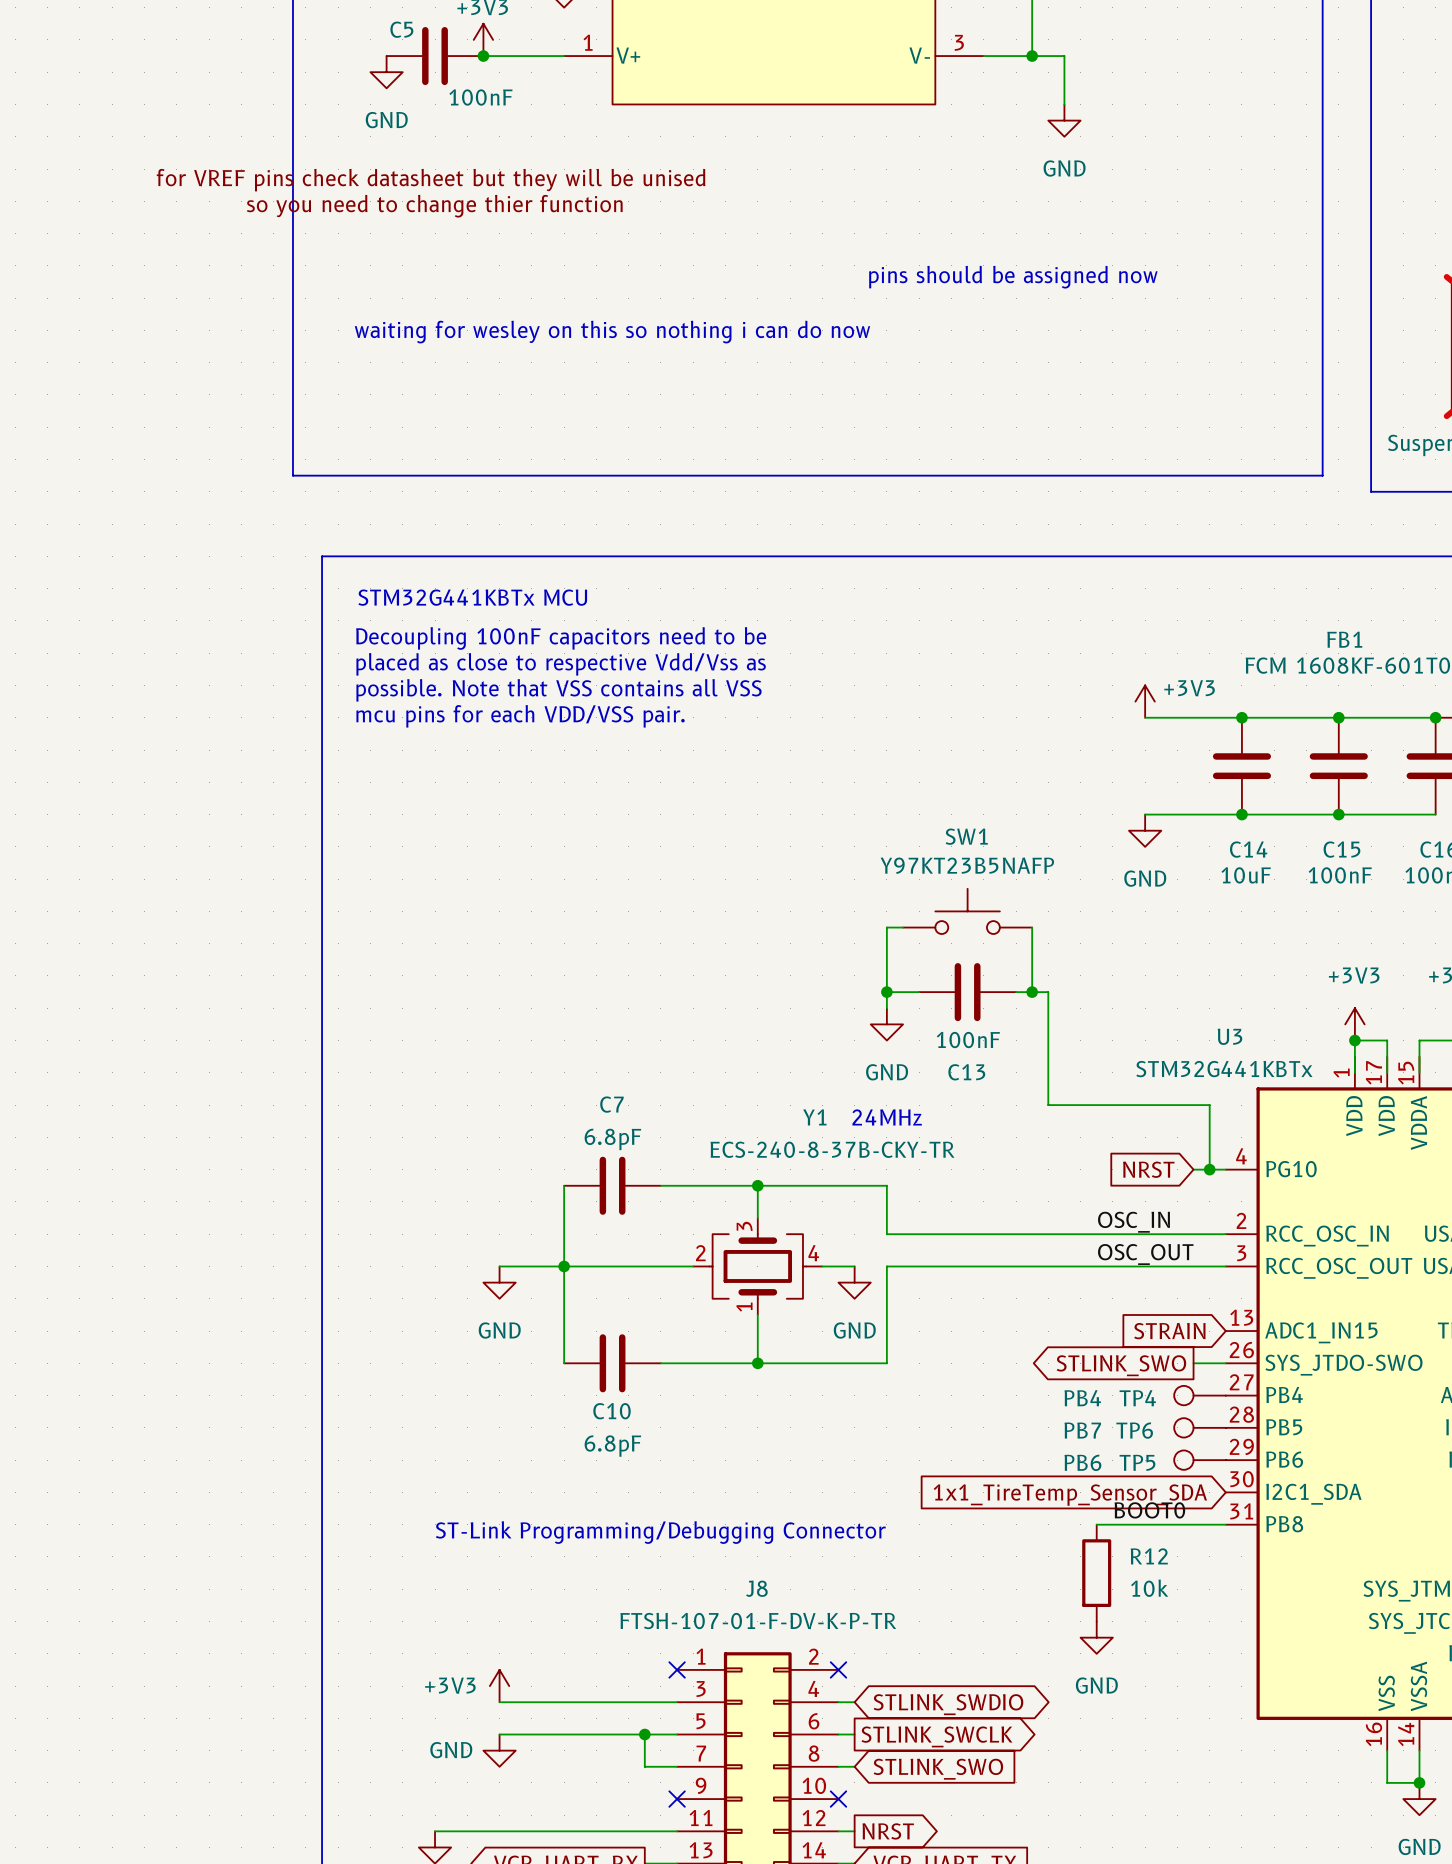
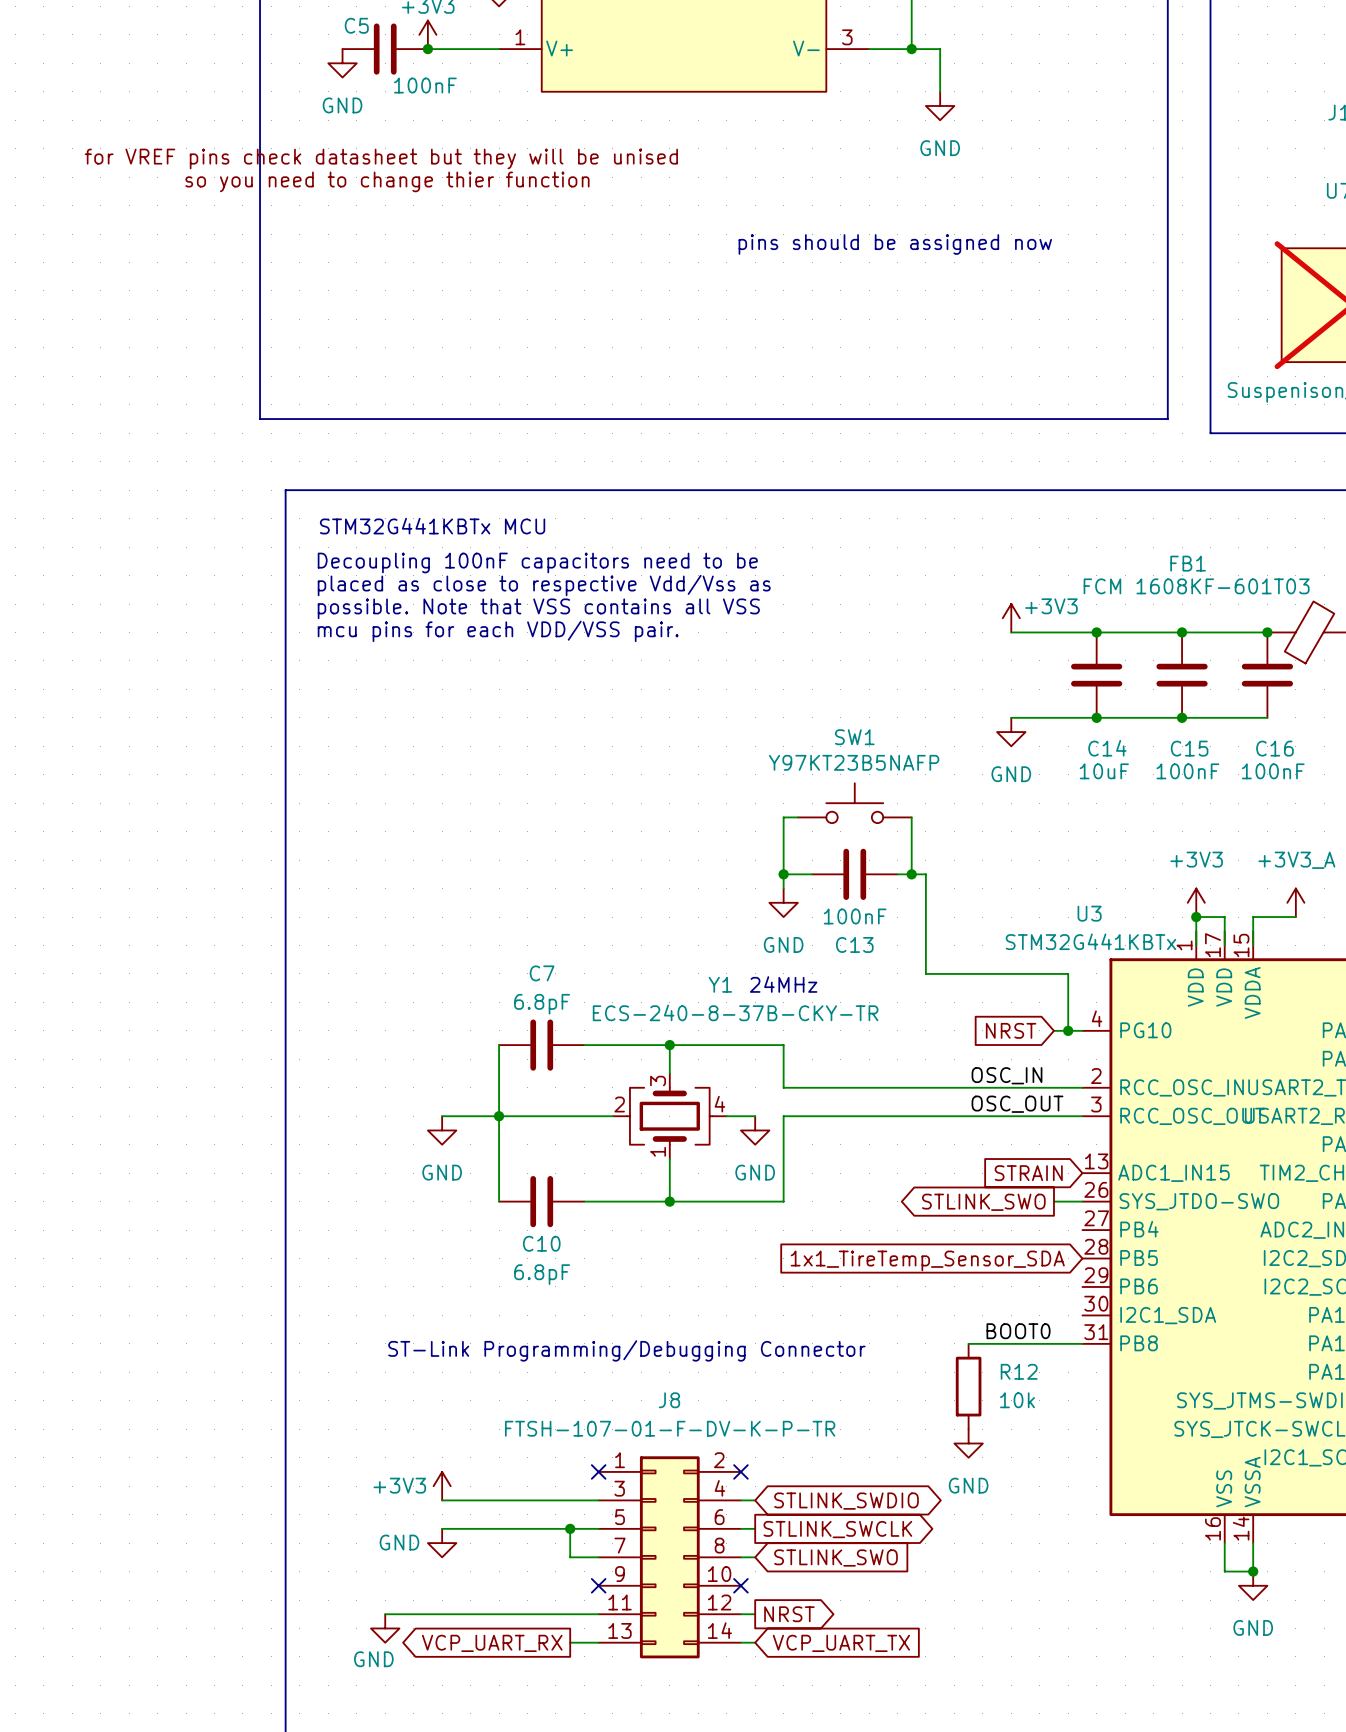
text: waiting for wesley on this so nothing i can do now (612, 332) -> none
TP4: PB4 (1200, 1395) -> none
TP6: PB7 (1200, 1427) -> none
TP5: PB6 (1200, 1460) -> none
global label position: 1x1_TireTemp_Sensor_SDA (1070, 1495) -> 1x1_TireTemp_Sensor_SDA (927, 1260)

